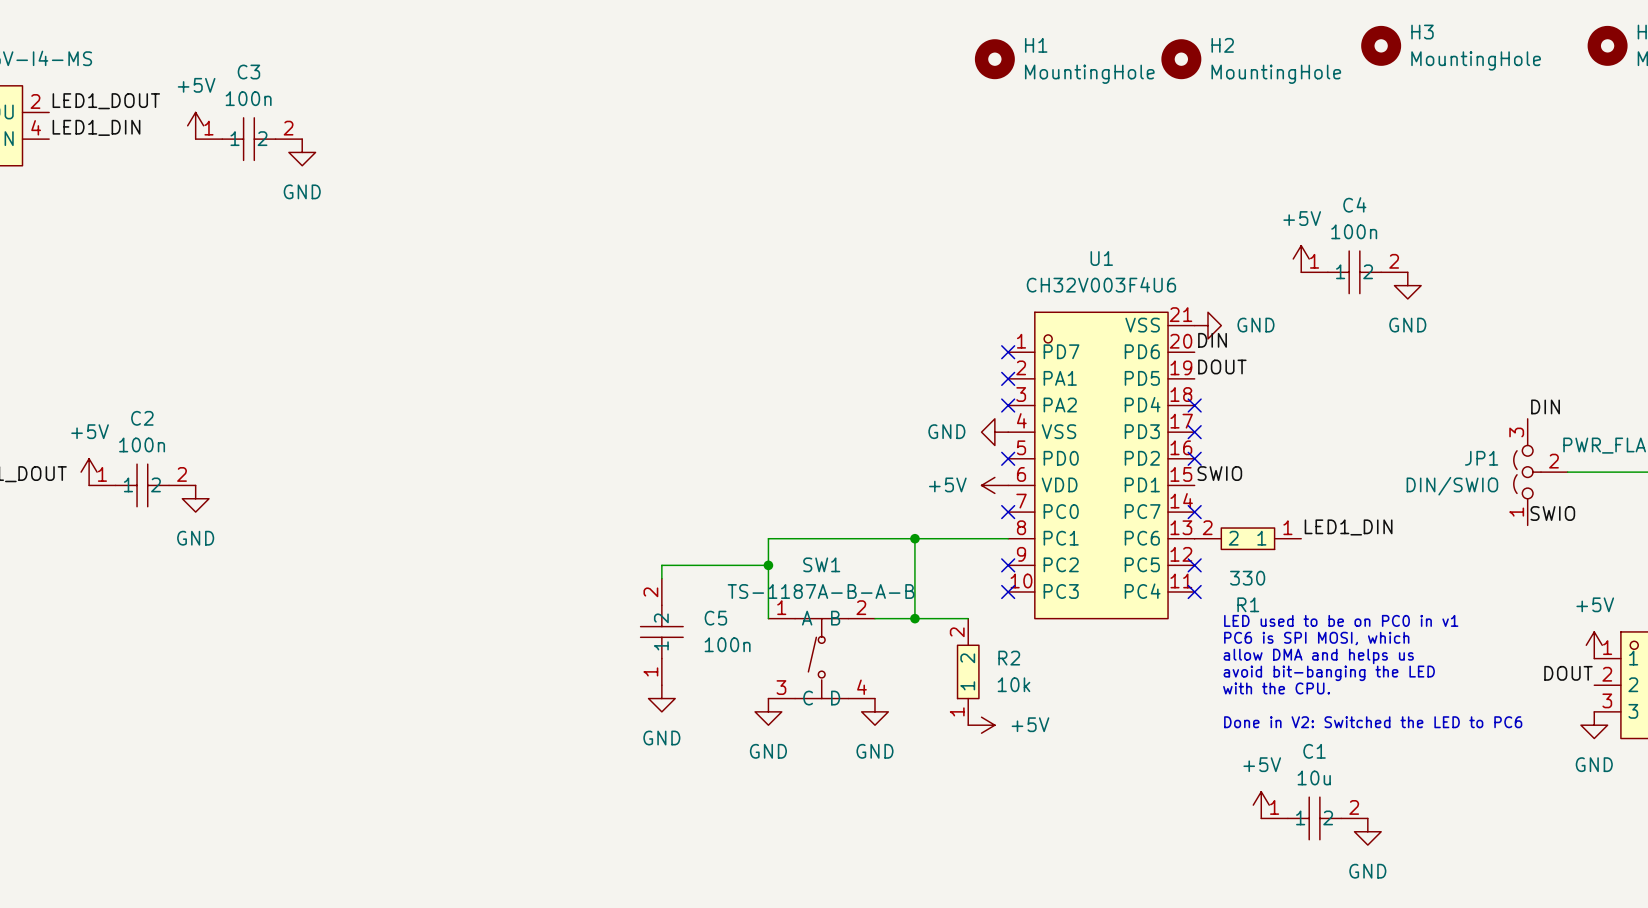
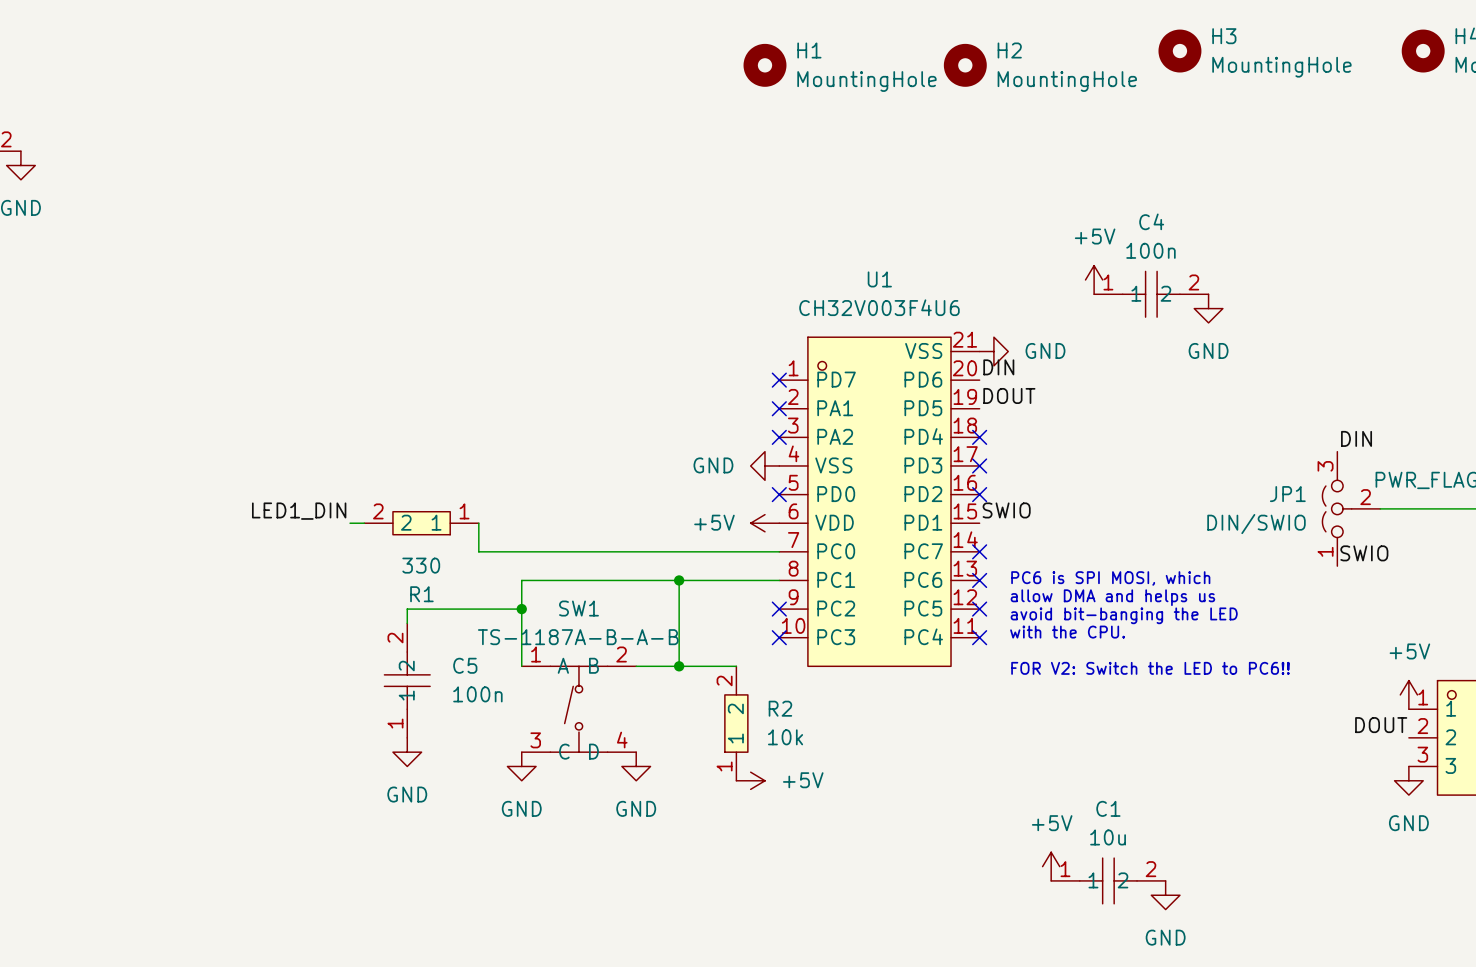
label: none -> LED1_DIN (299, 511)
wire: none -> (350, 523) (364, 523)
wire: none -> (478, 523) (478, 551) (779, 551)
no-connect mark: (1008, 512) -> none
label: LED1_DIN (1348, 527) -> none
no-connect mark: none -> (979, 580)
R1 position: (1247, 538) -> (421, 523)
text: LED used to be on PC0 in v1 (1341, 620) -> FOR V2: Switch the LED to PC6!! (1150, 668)
text position: PC6 is SPI MOSI, which (1316, 638) -> PC6 is SPI MOSI, which (1110, 578)
text position: allow DMA and helps us (1318, 656) -> allow DMA and helps us (1112, 597)
text position: avoid bit-banging the LED (1329, 673) -> avoid bit-banging the LED (1124, 615)
text position: with the CPU. (1276, 688) -> with the CPU. (1067, 632)
text: Done in V2: Switched the LED to PC6 (1373, 722) -> none

